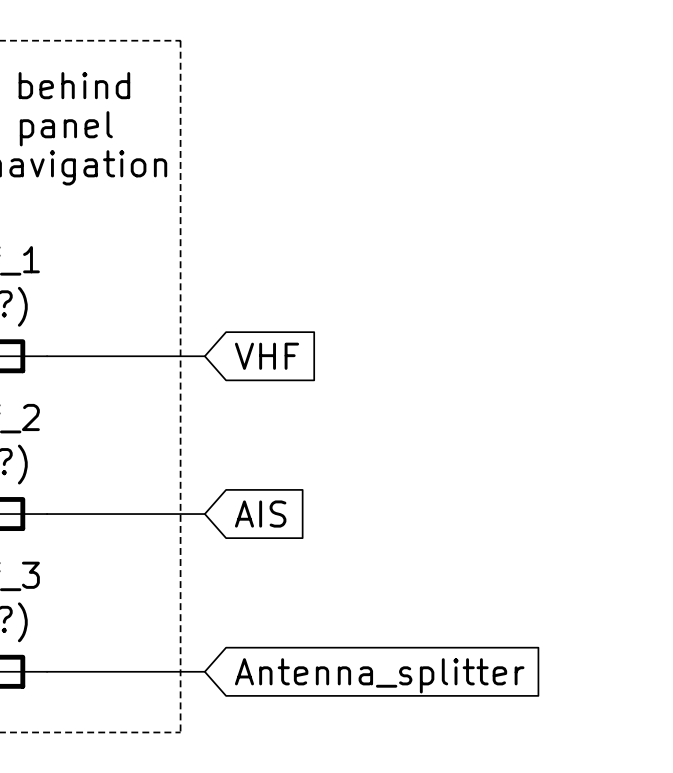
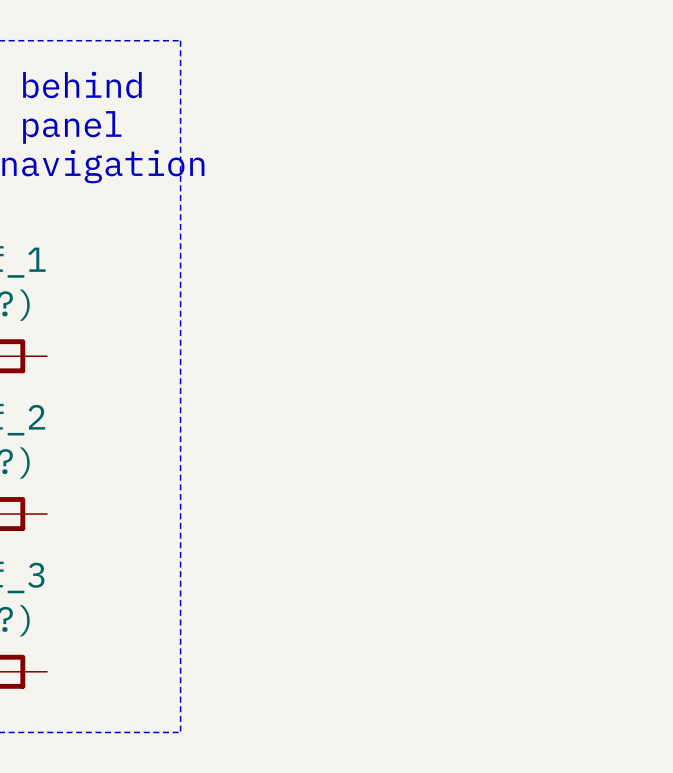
wire: (47, 356) (204, 356) -> none
global label: VHF (267, 356) -> none
wire: (47, 514) (204, 514) -> none
global label: AIS (260, 514) -> none
wire: (47, 671) (204, 671) -> none
global label: Antenna_splitter (379, 675) -> none

